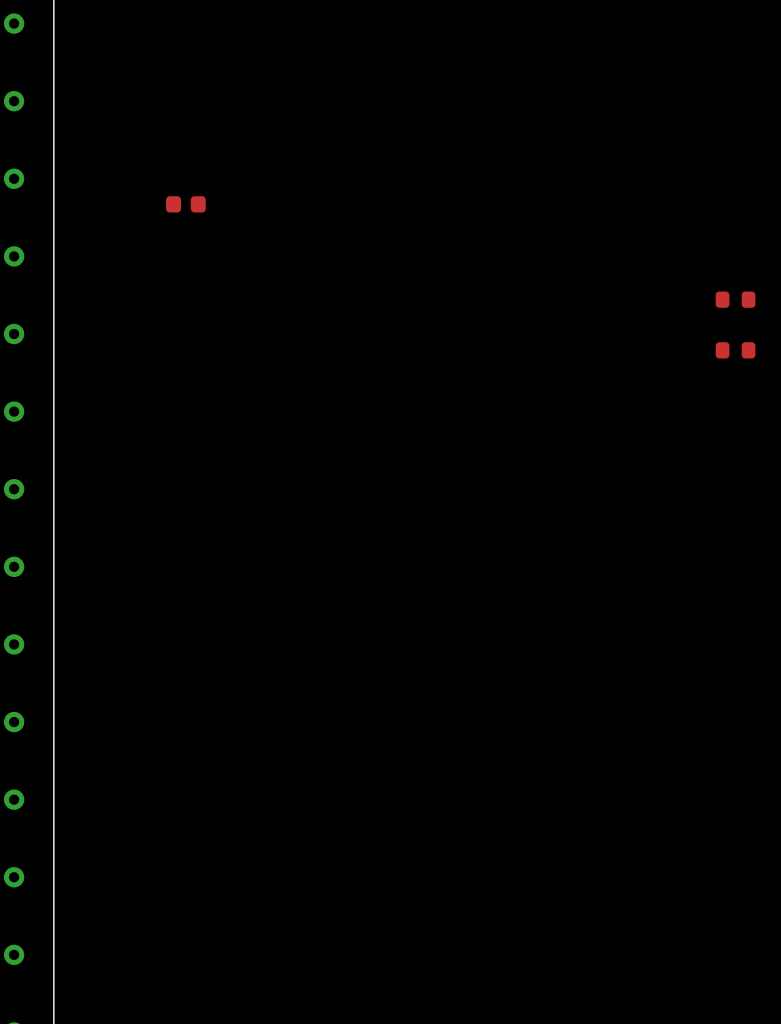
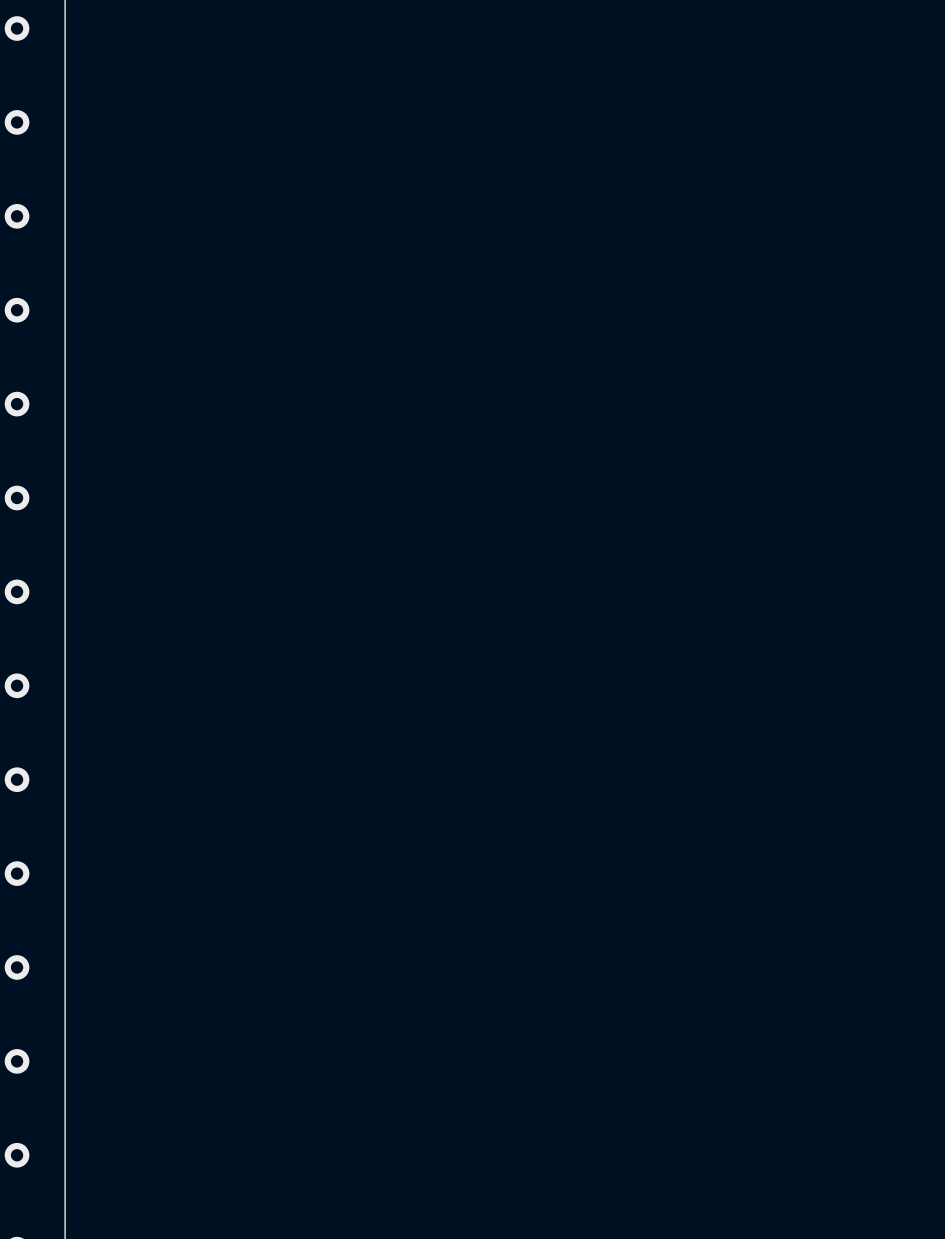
part: (185, 204) -> none
part: (735, 299) -> none
part: (735, 350) -> none

